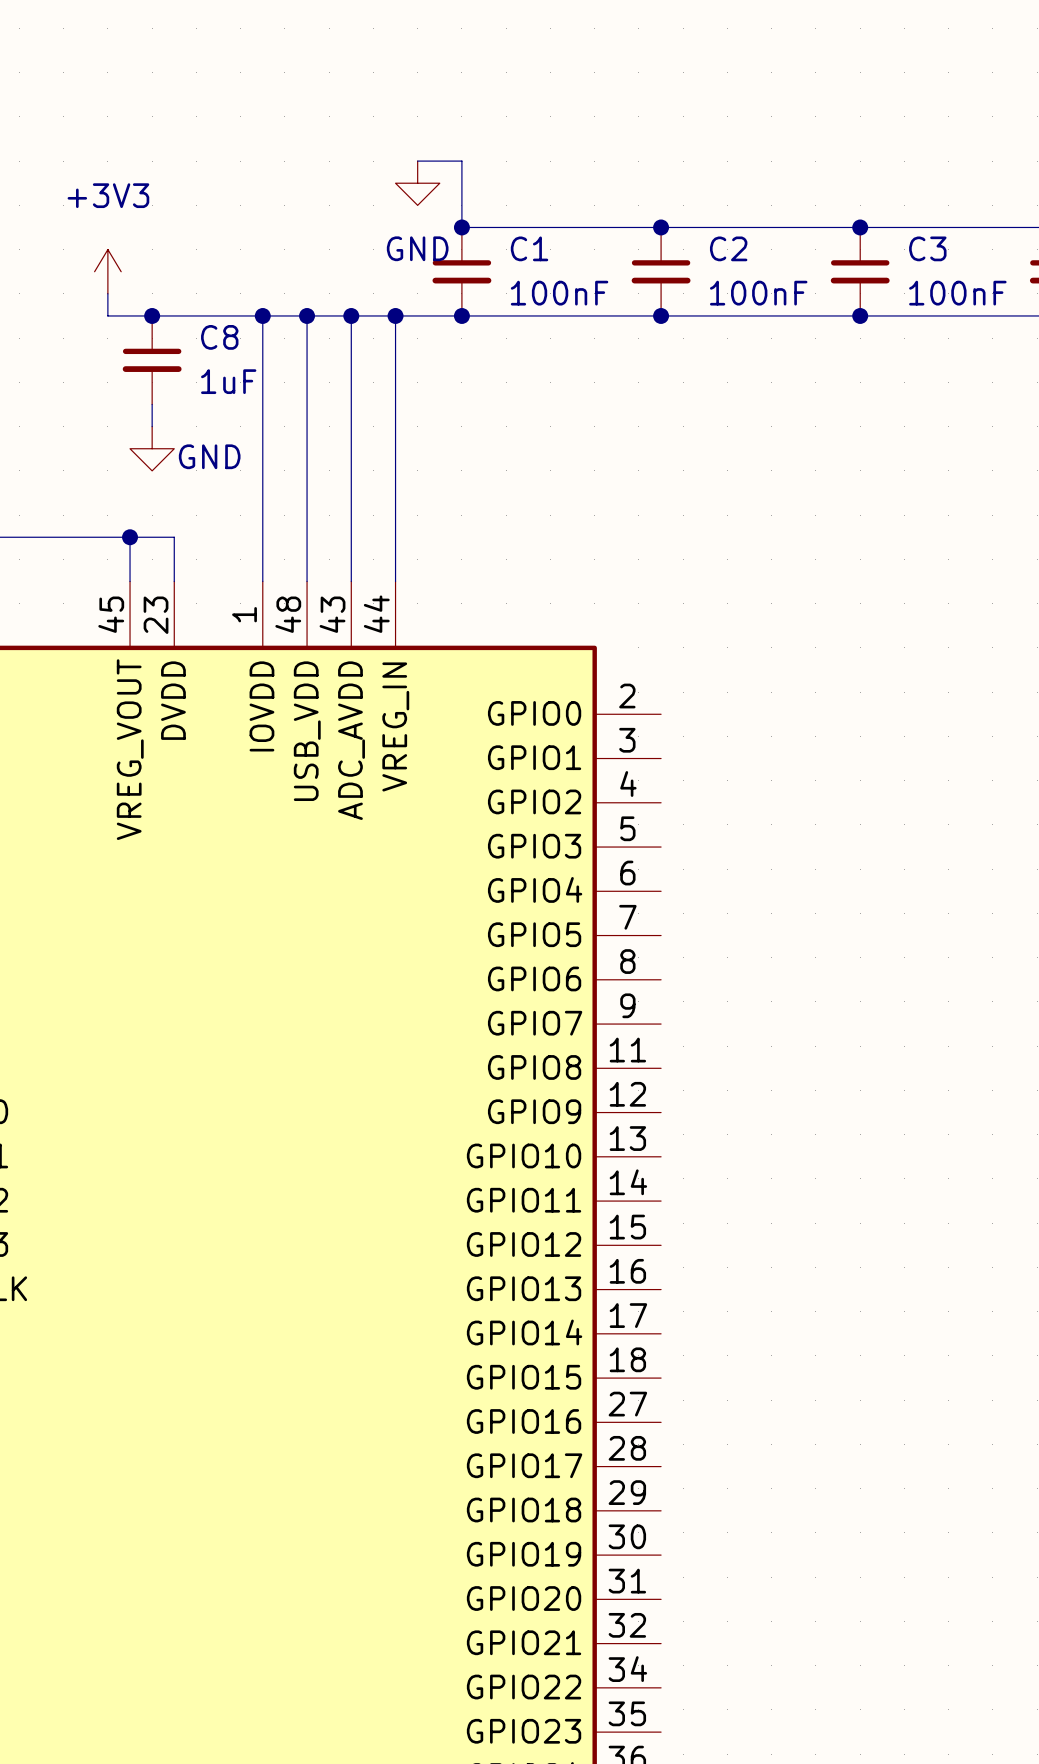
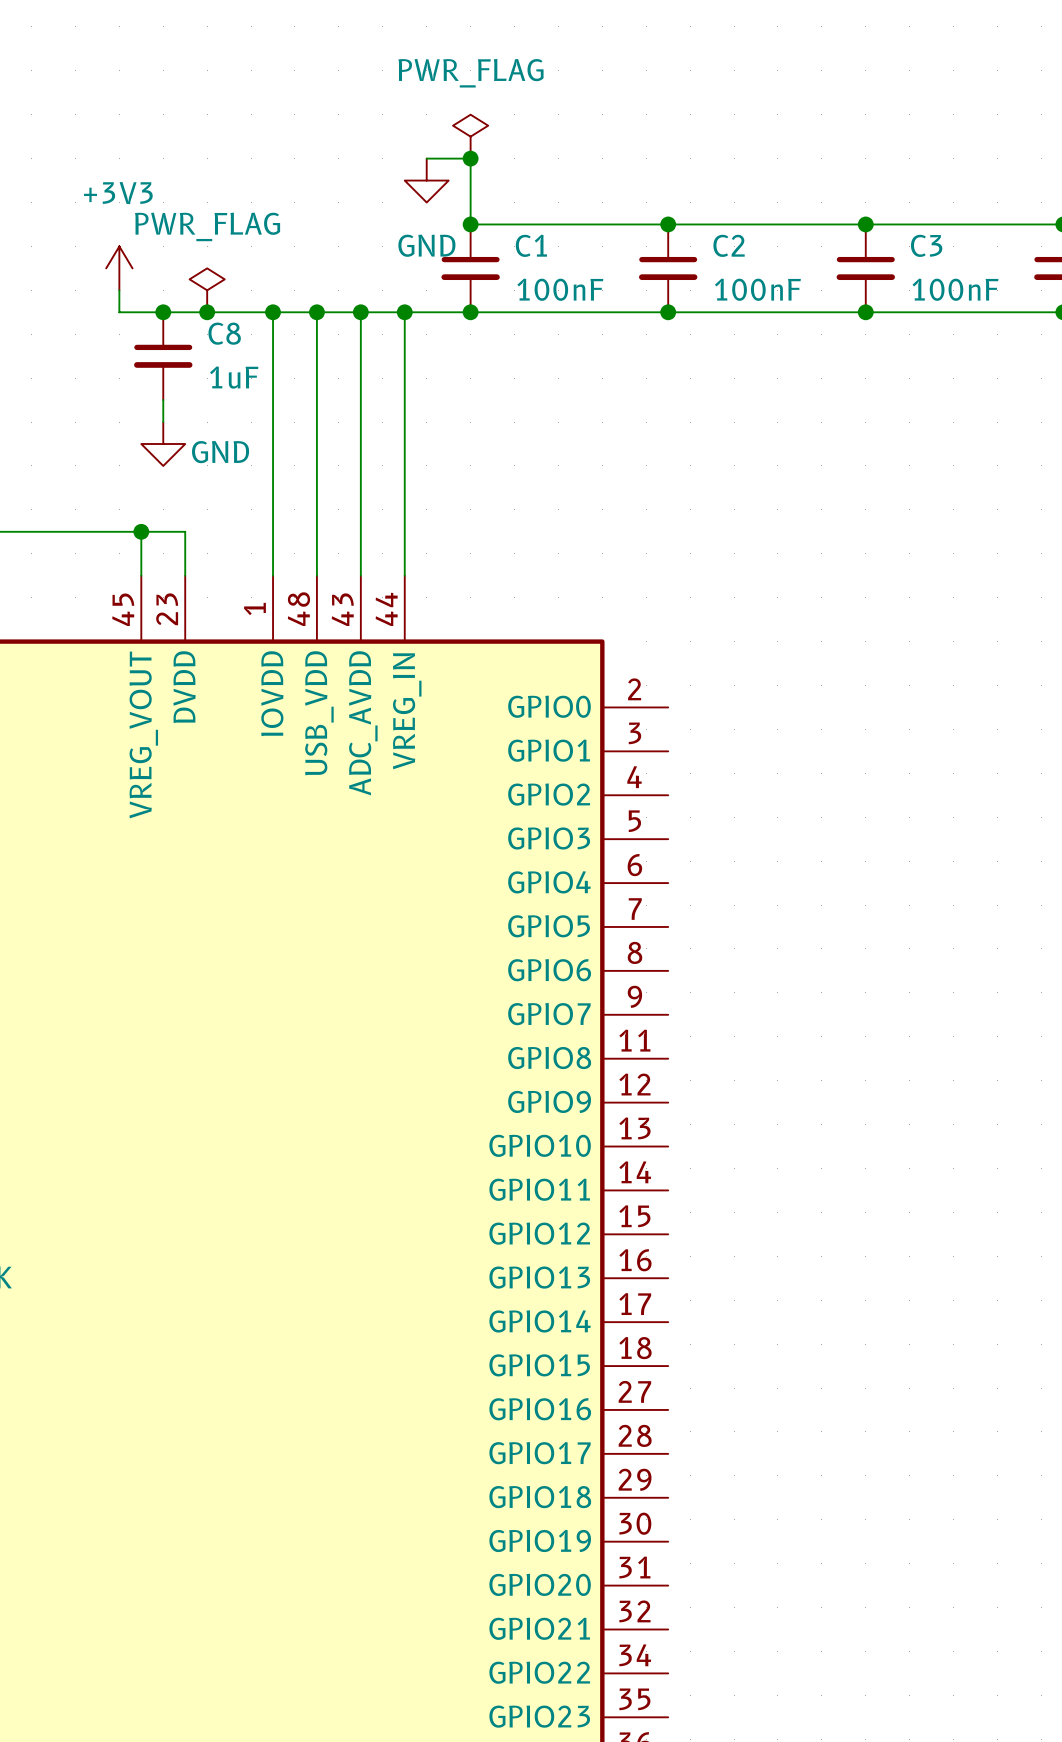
power symbol: none -> PWR_FLAG (470, 136)
junction: none -> (470, 158)
power symbol: none -> PWR_FLAG (207, 290)
junction: none -> (207, 312)

